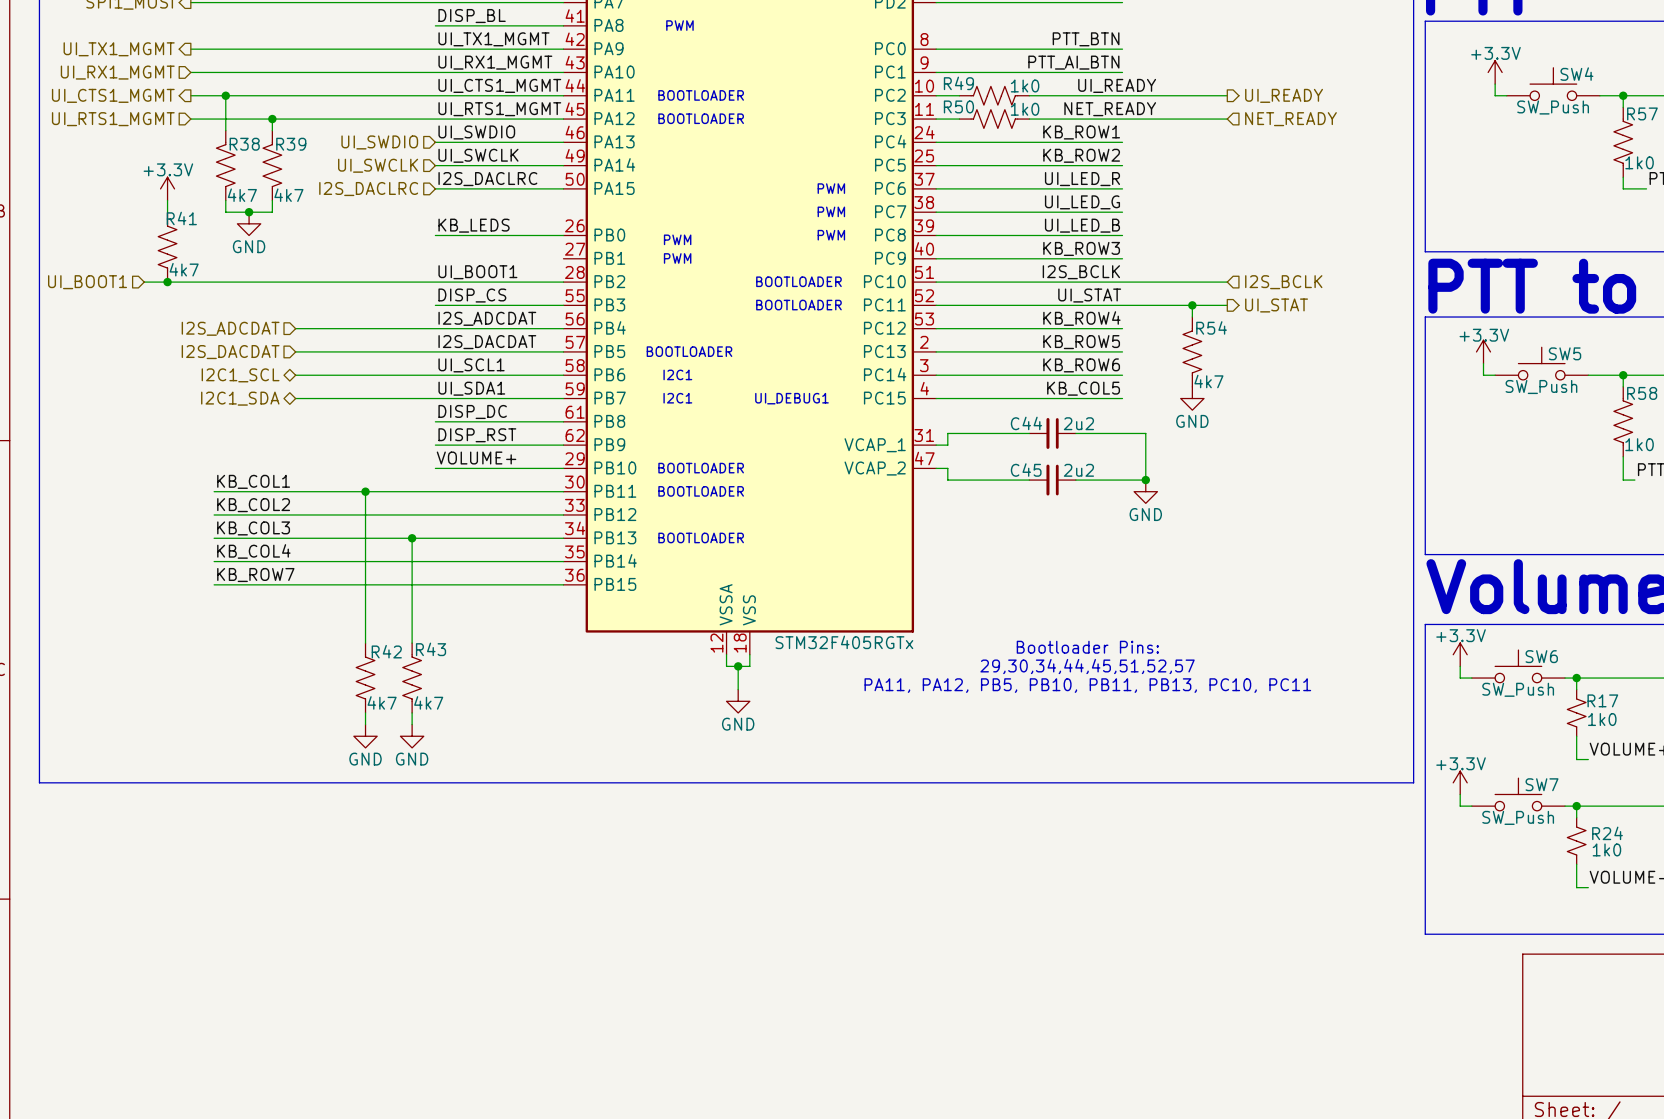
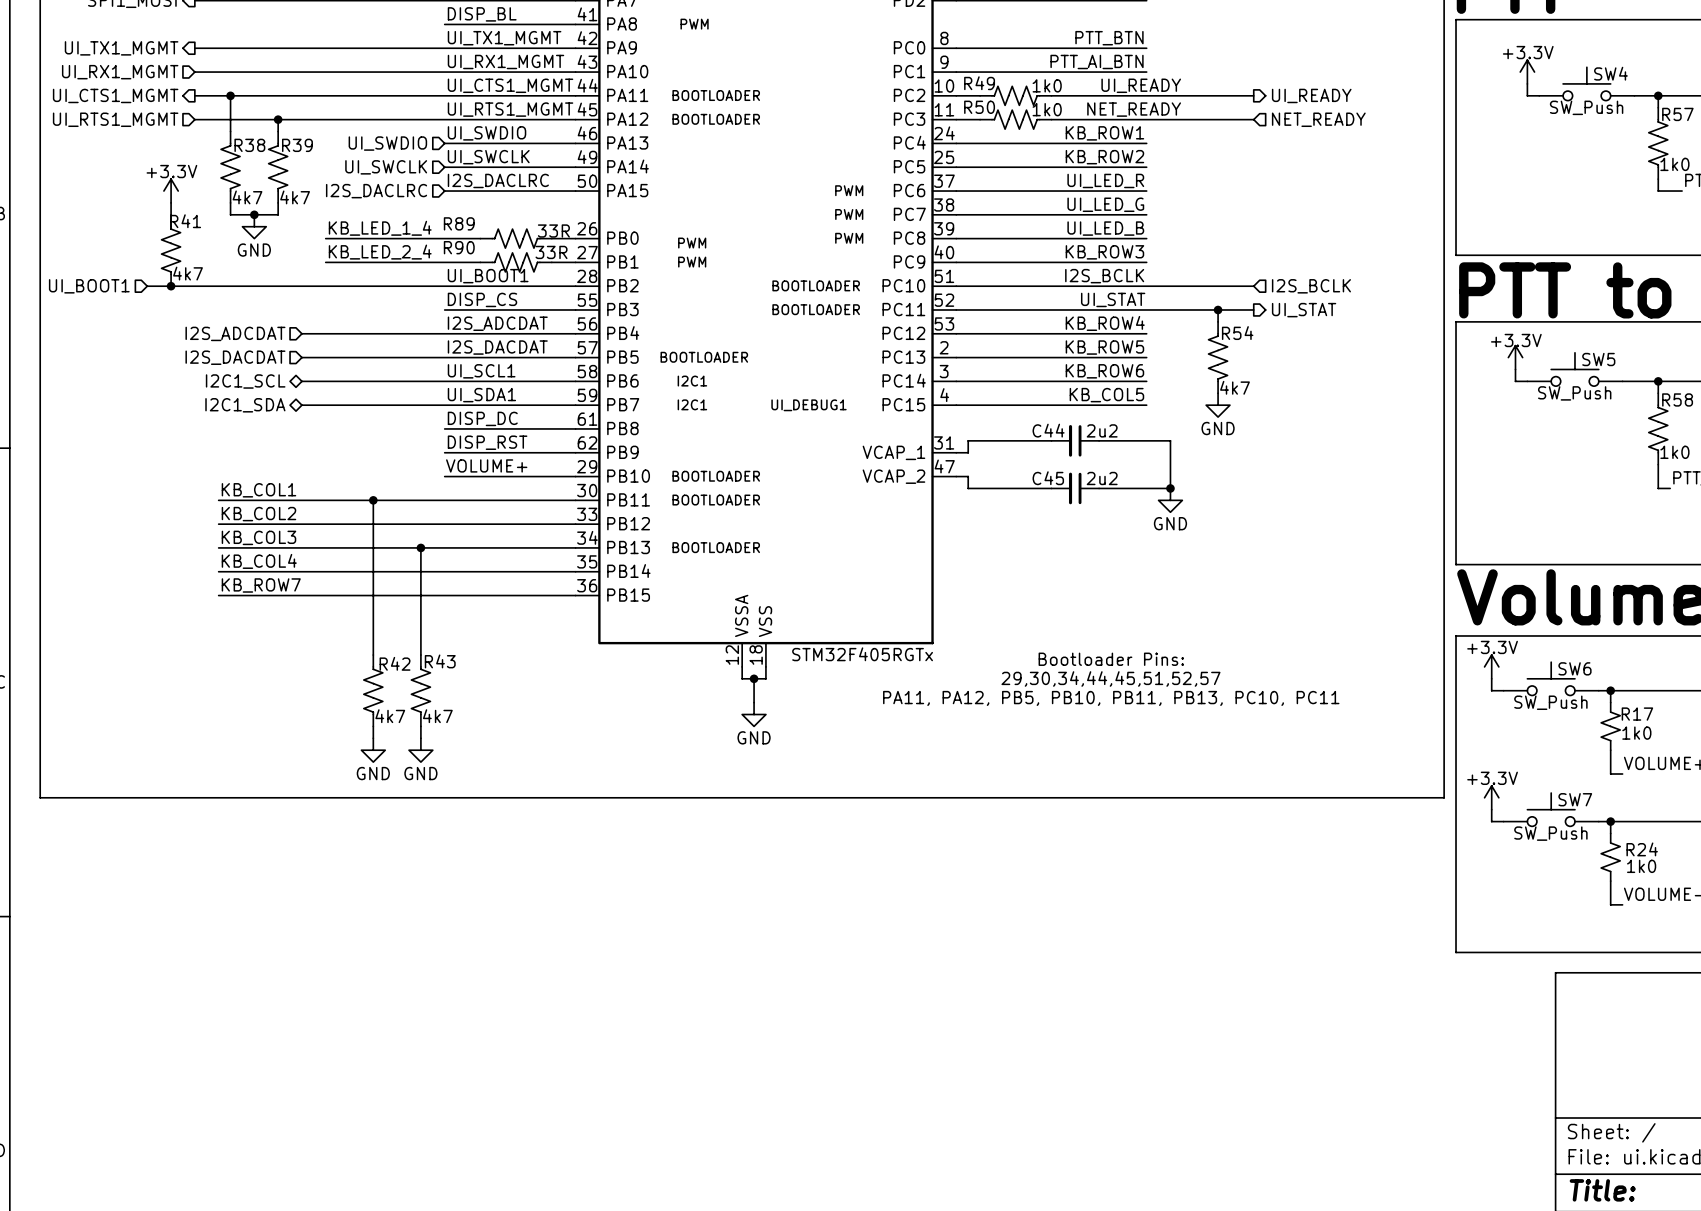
label: none -> KB_LED_1_4 (380, 228)
label: KB_LEDS (474, 225) -> none
wire: none -> (325, 238) (444, 238)
R89: none -> 33R (516, 238)
label: none -> KB_LED_2_4 (380, 252)
wire: none -> (325, 262) (480, 262)
R90: none -> 33R (516, 262)
wire: none -> (551, 262) (575, 262)

